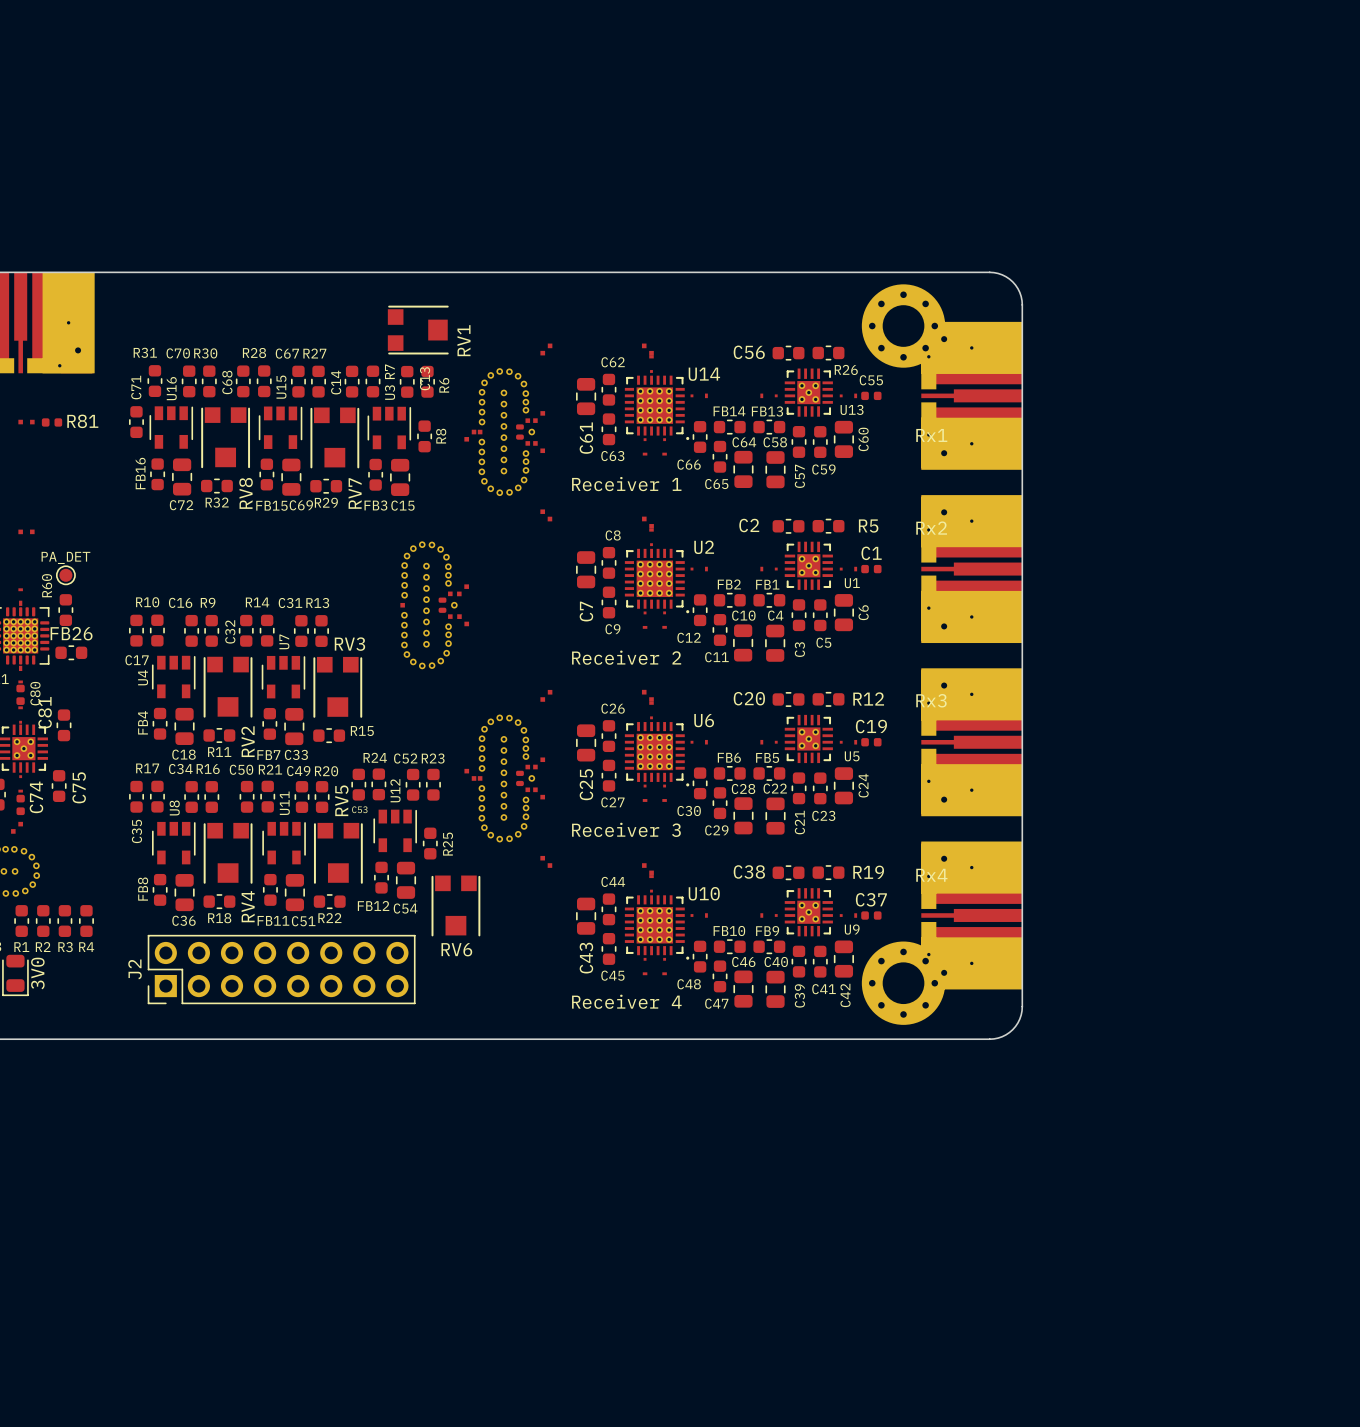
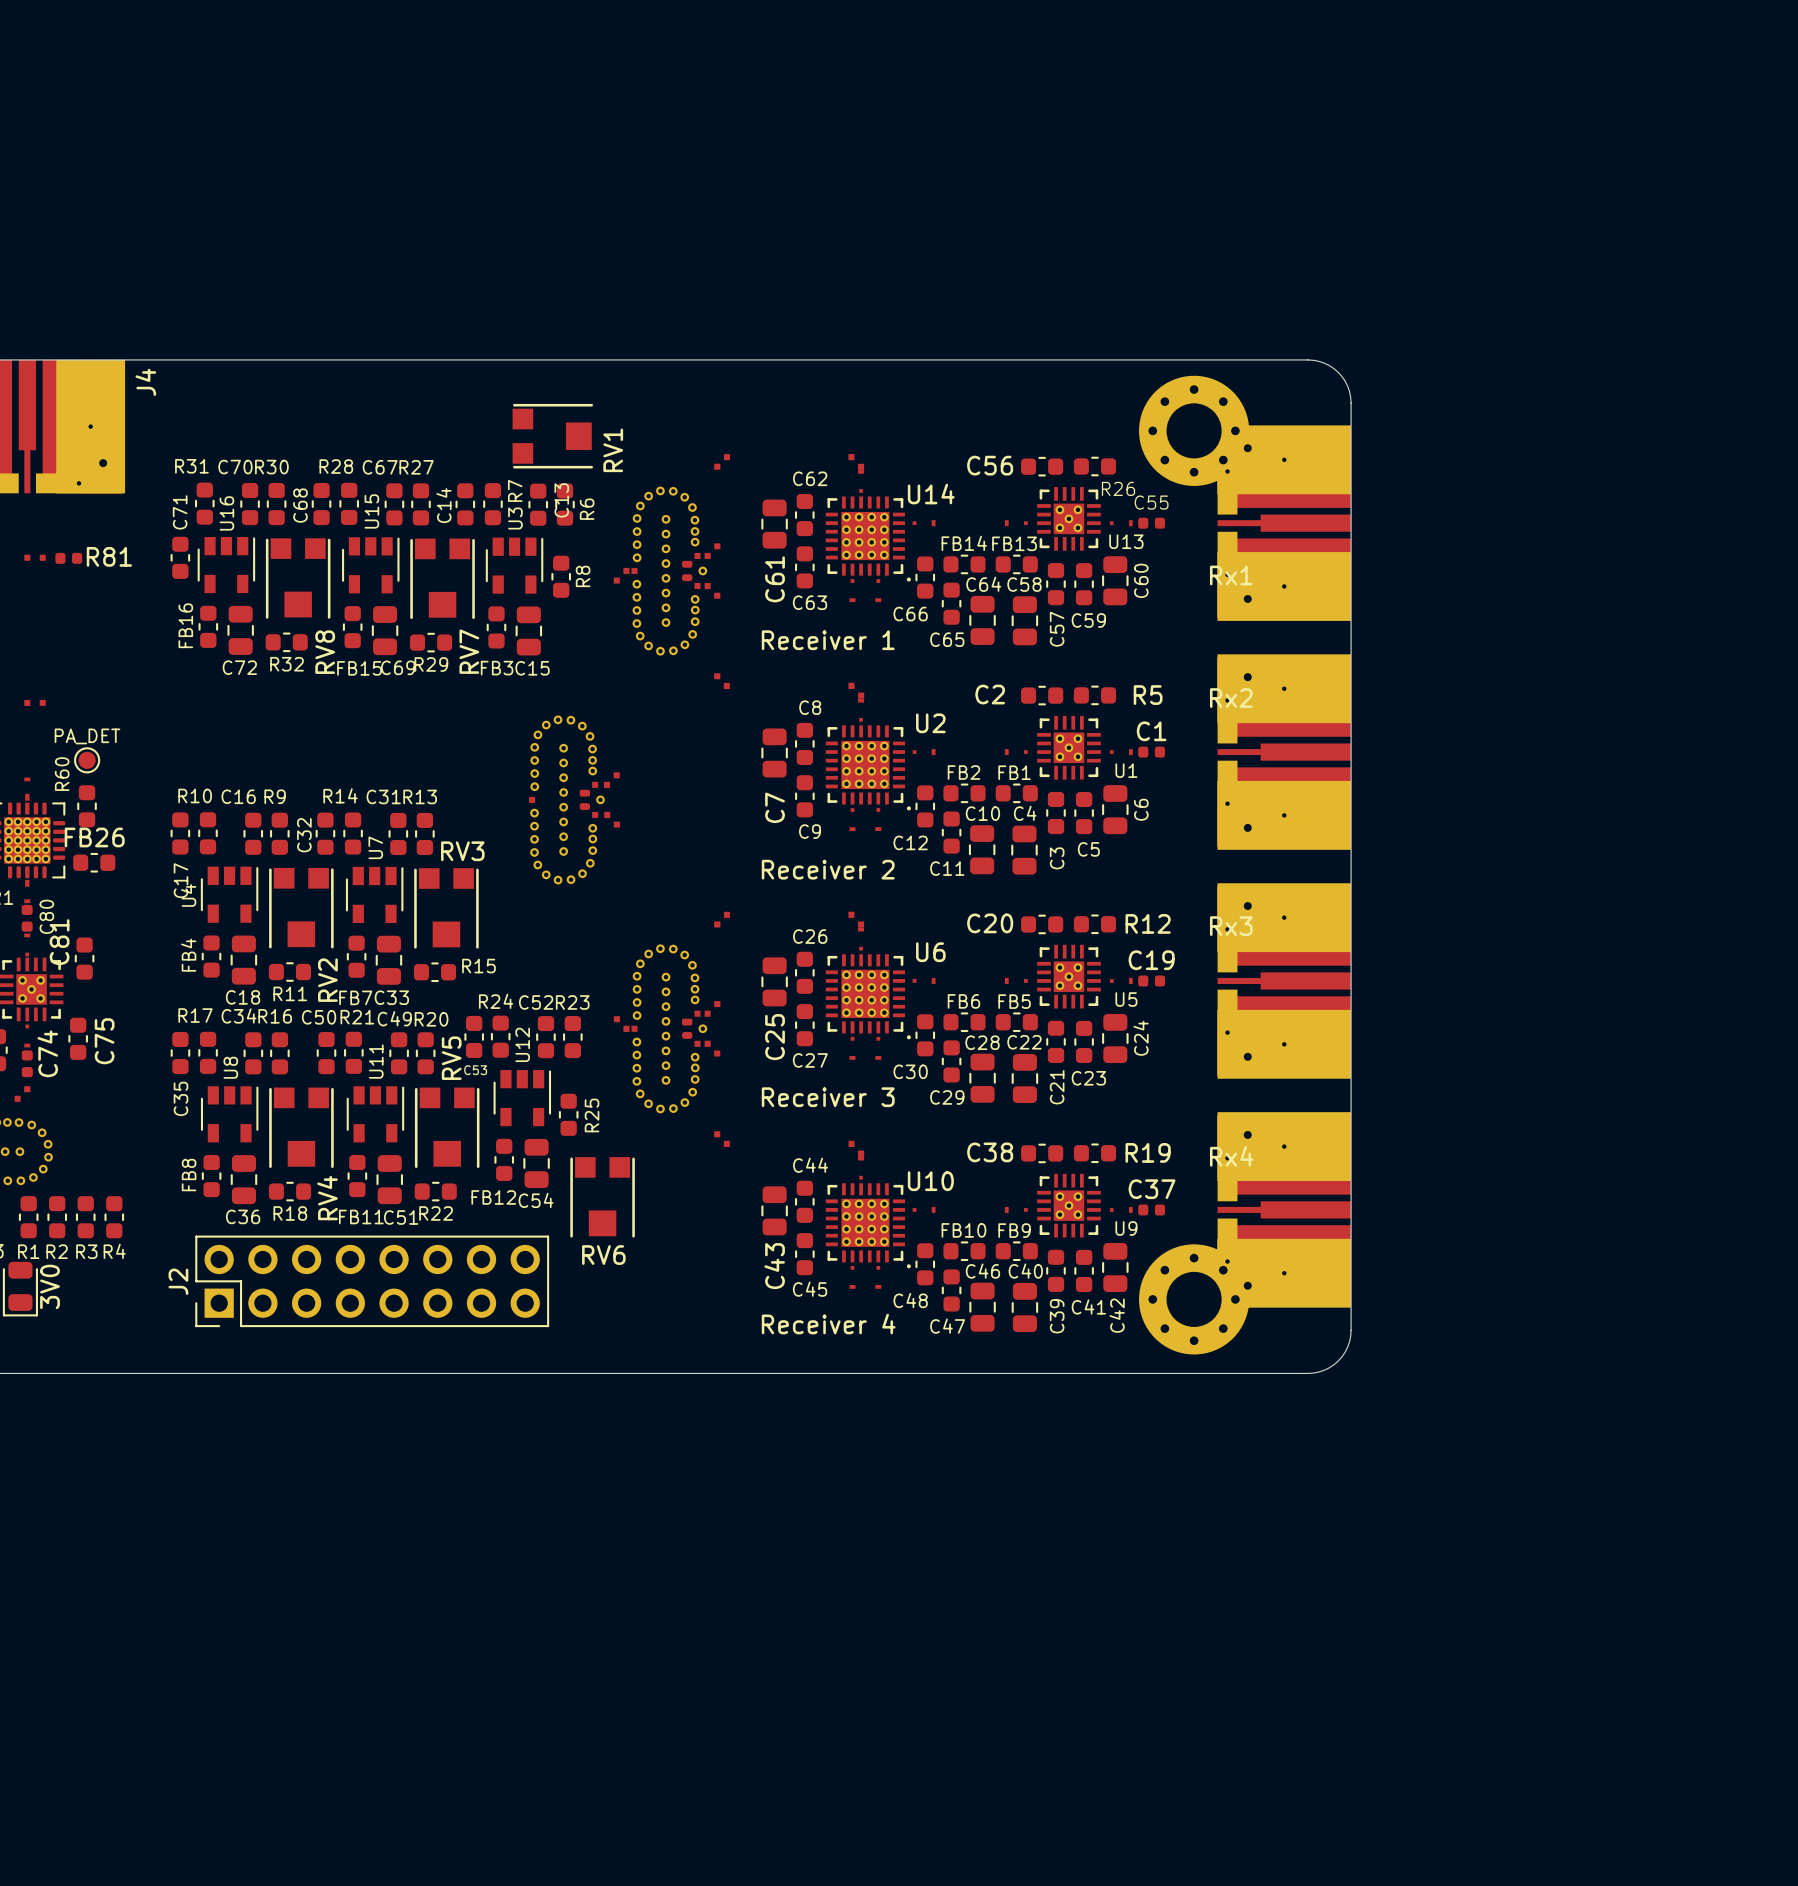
J4 name: none -> J4 (145, 382)
C17 name rotation: 0° (137, 660) -> 90° counterclockwise (181, 880)

